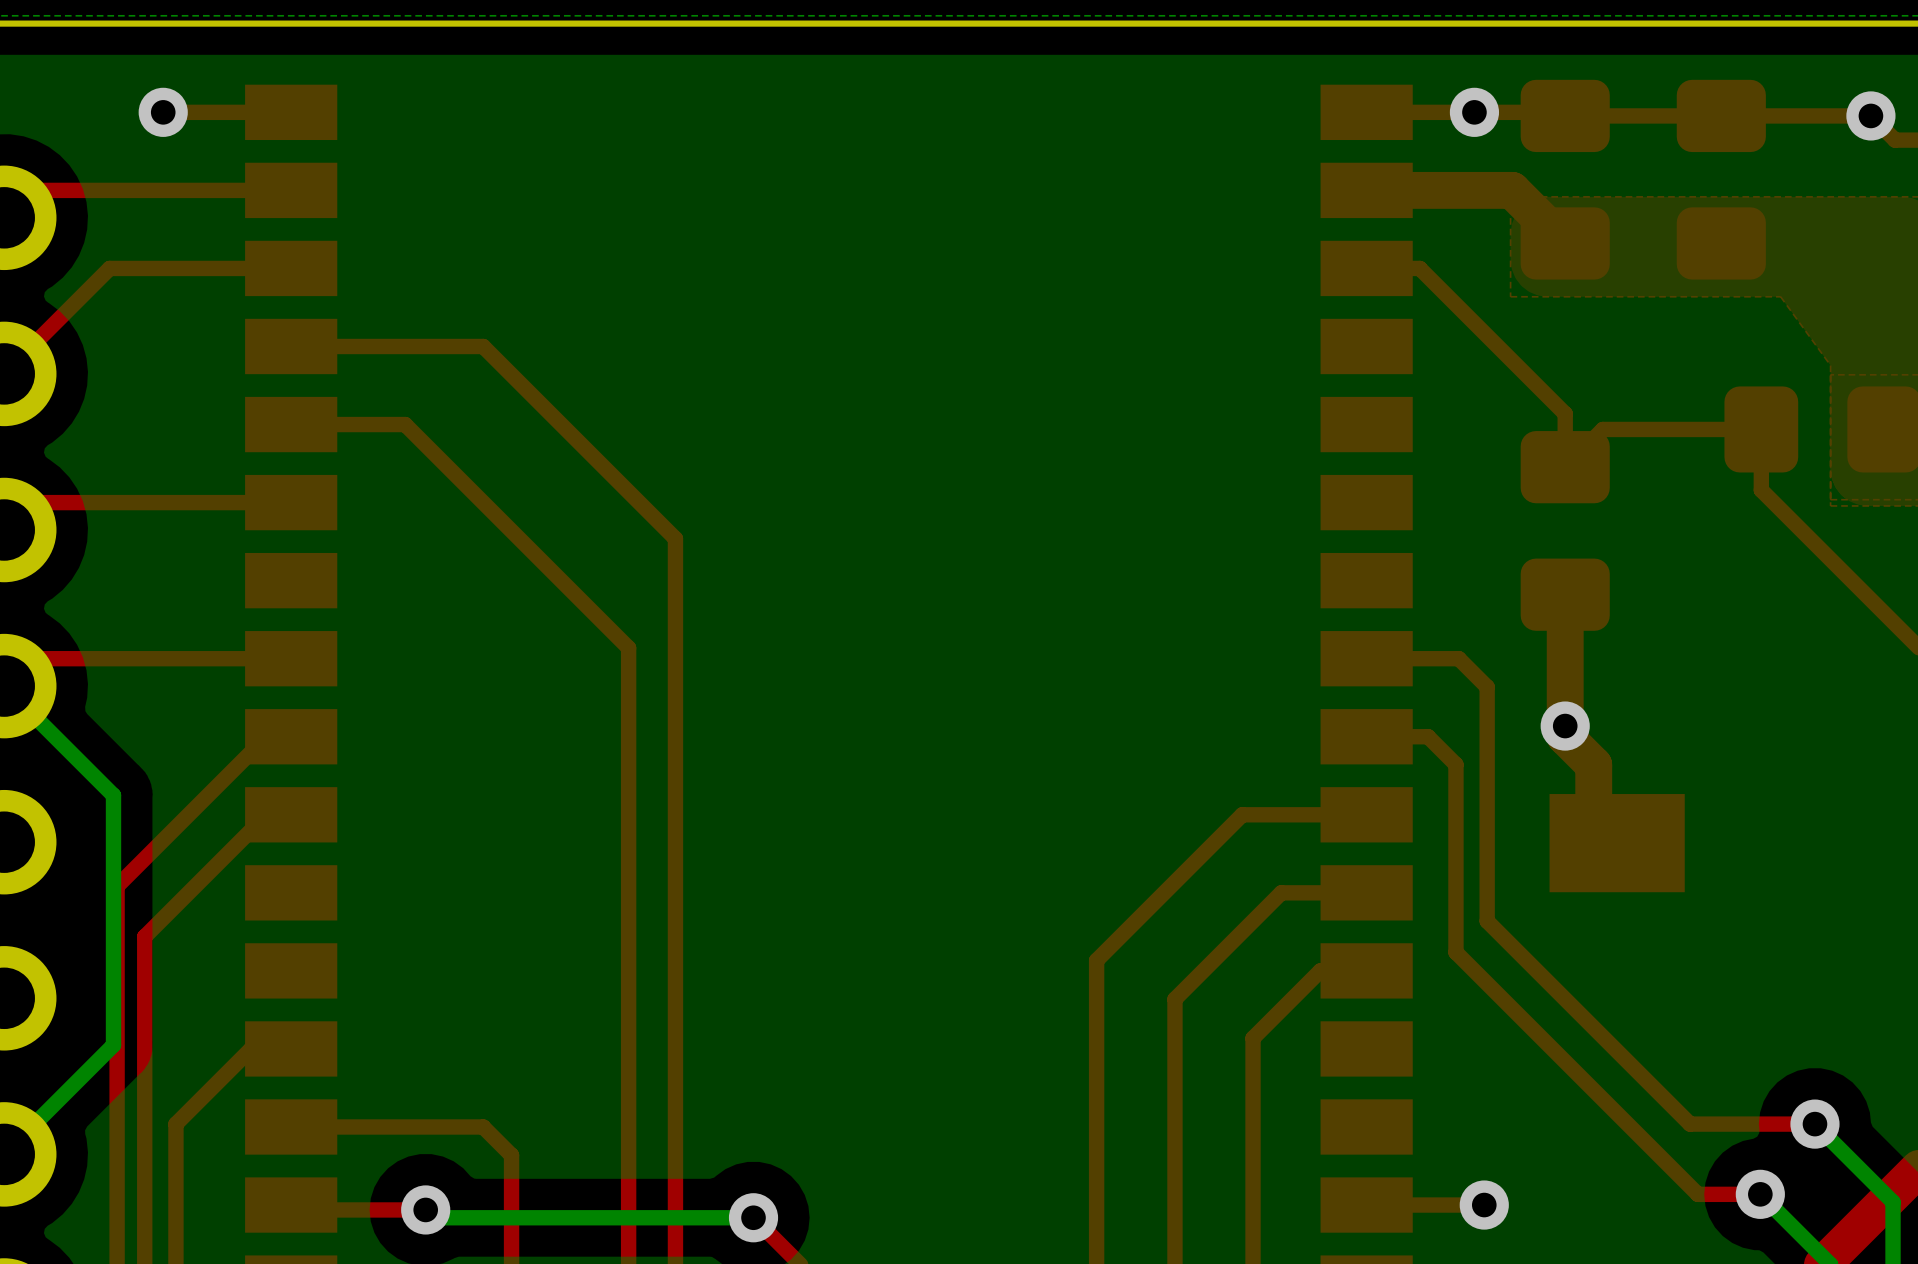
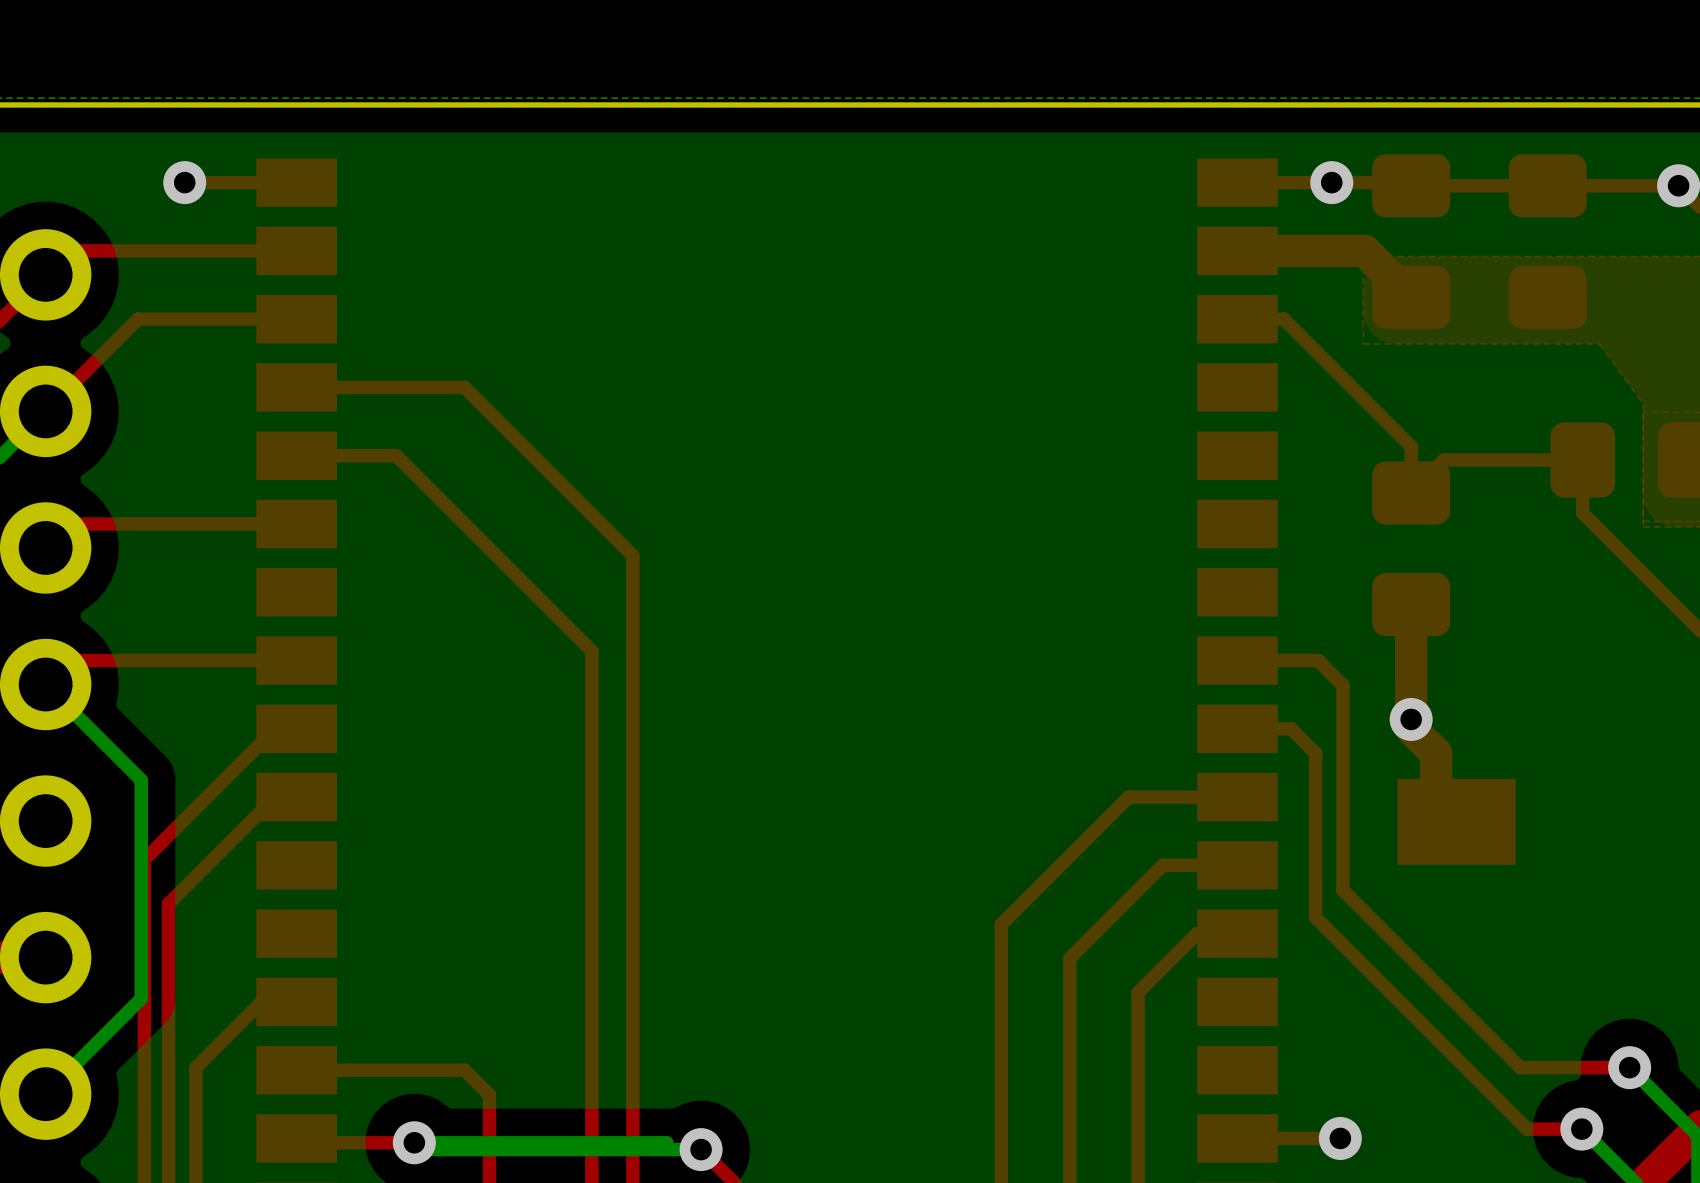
bottom track: none -> (666, 1142) (414, 1142)

